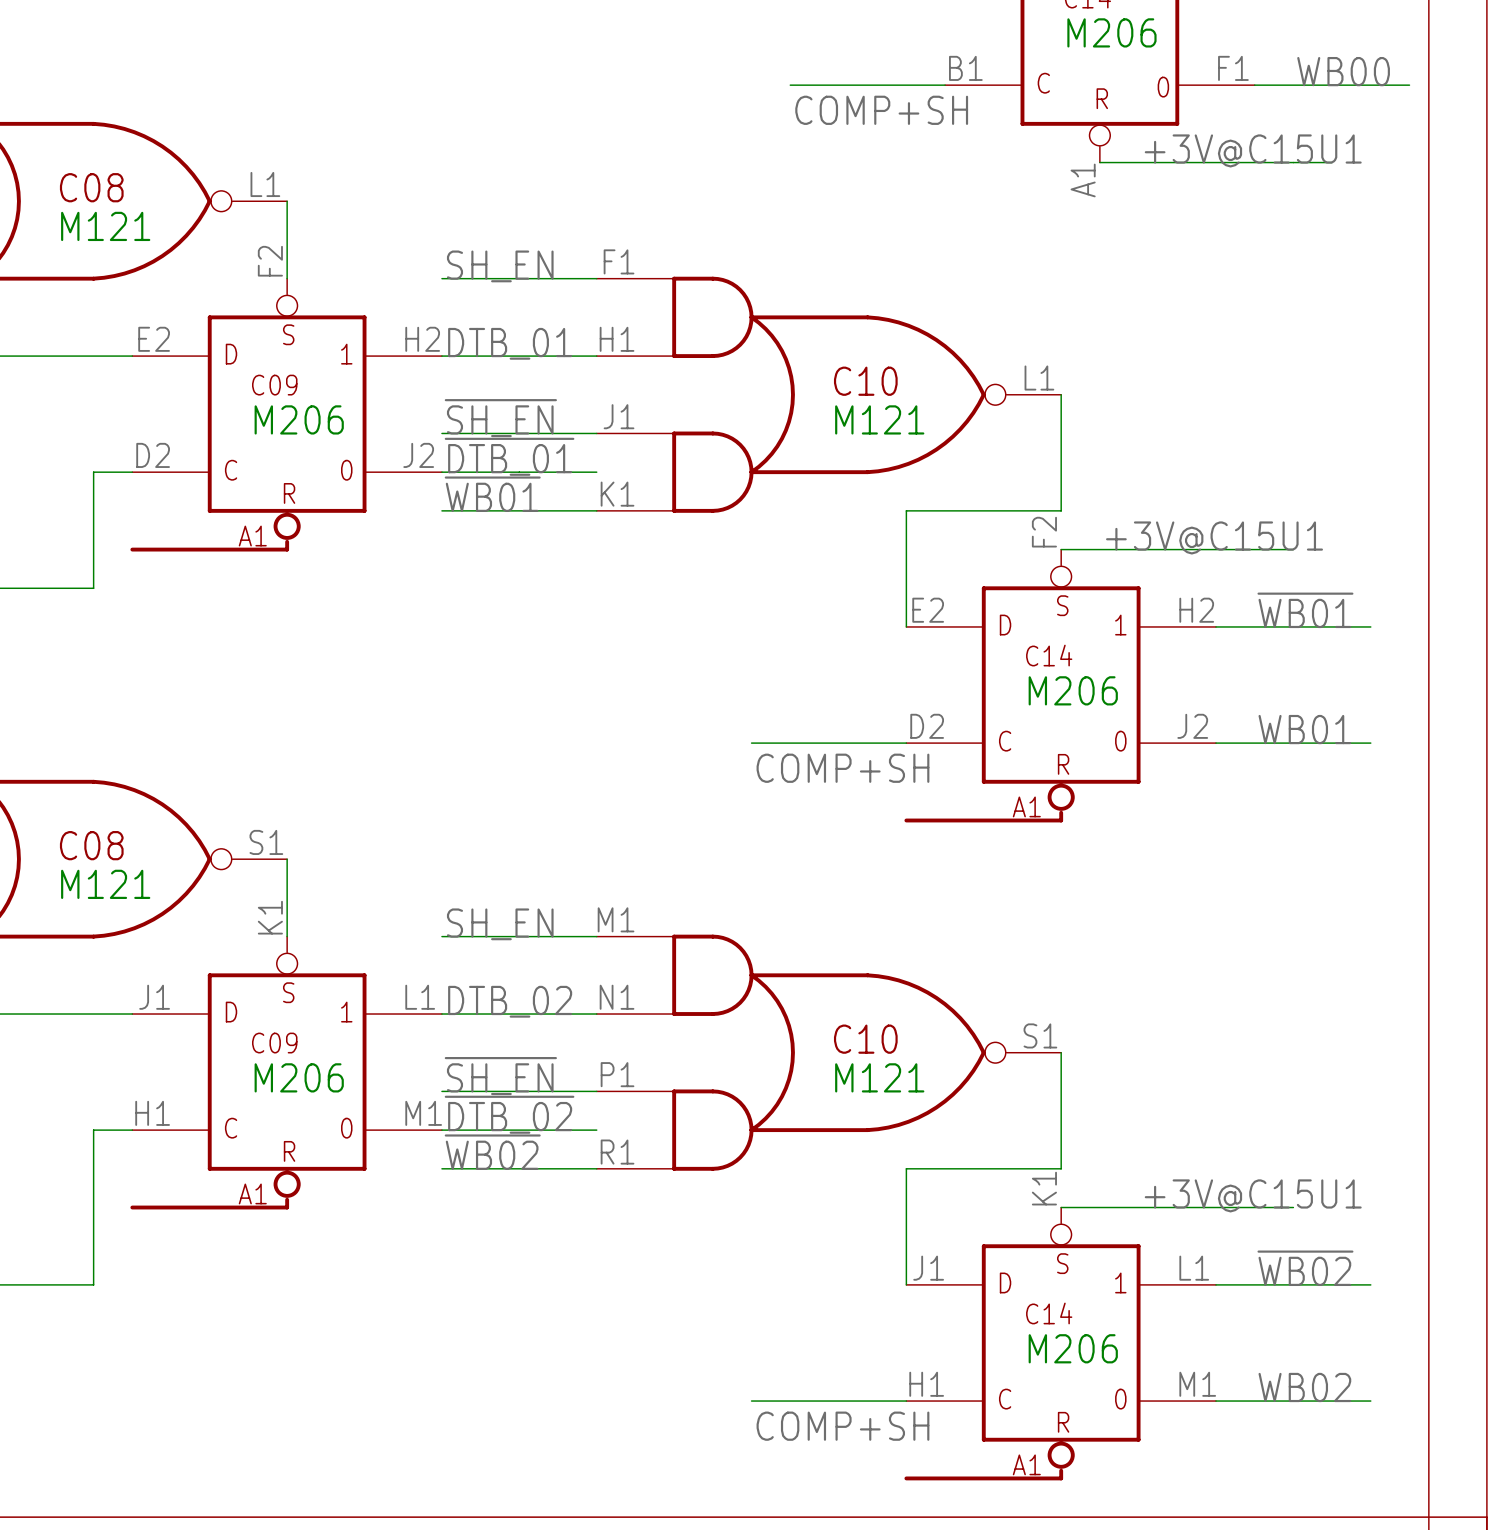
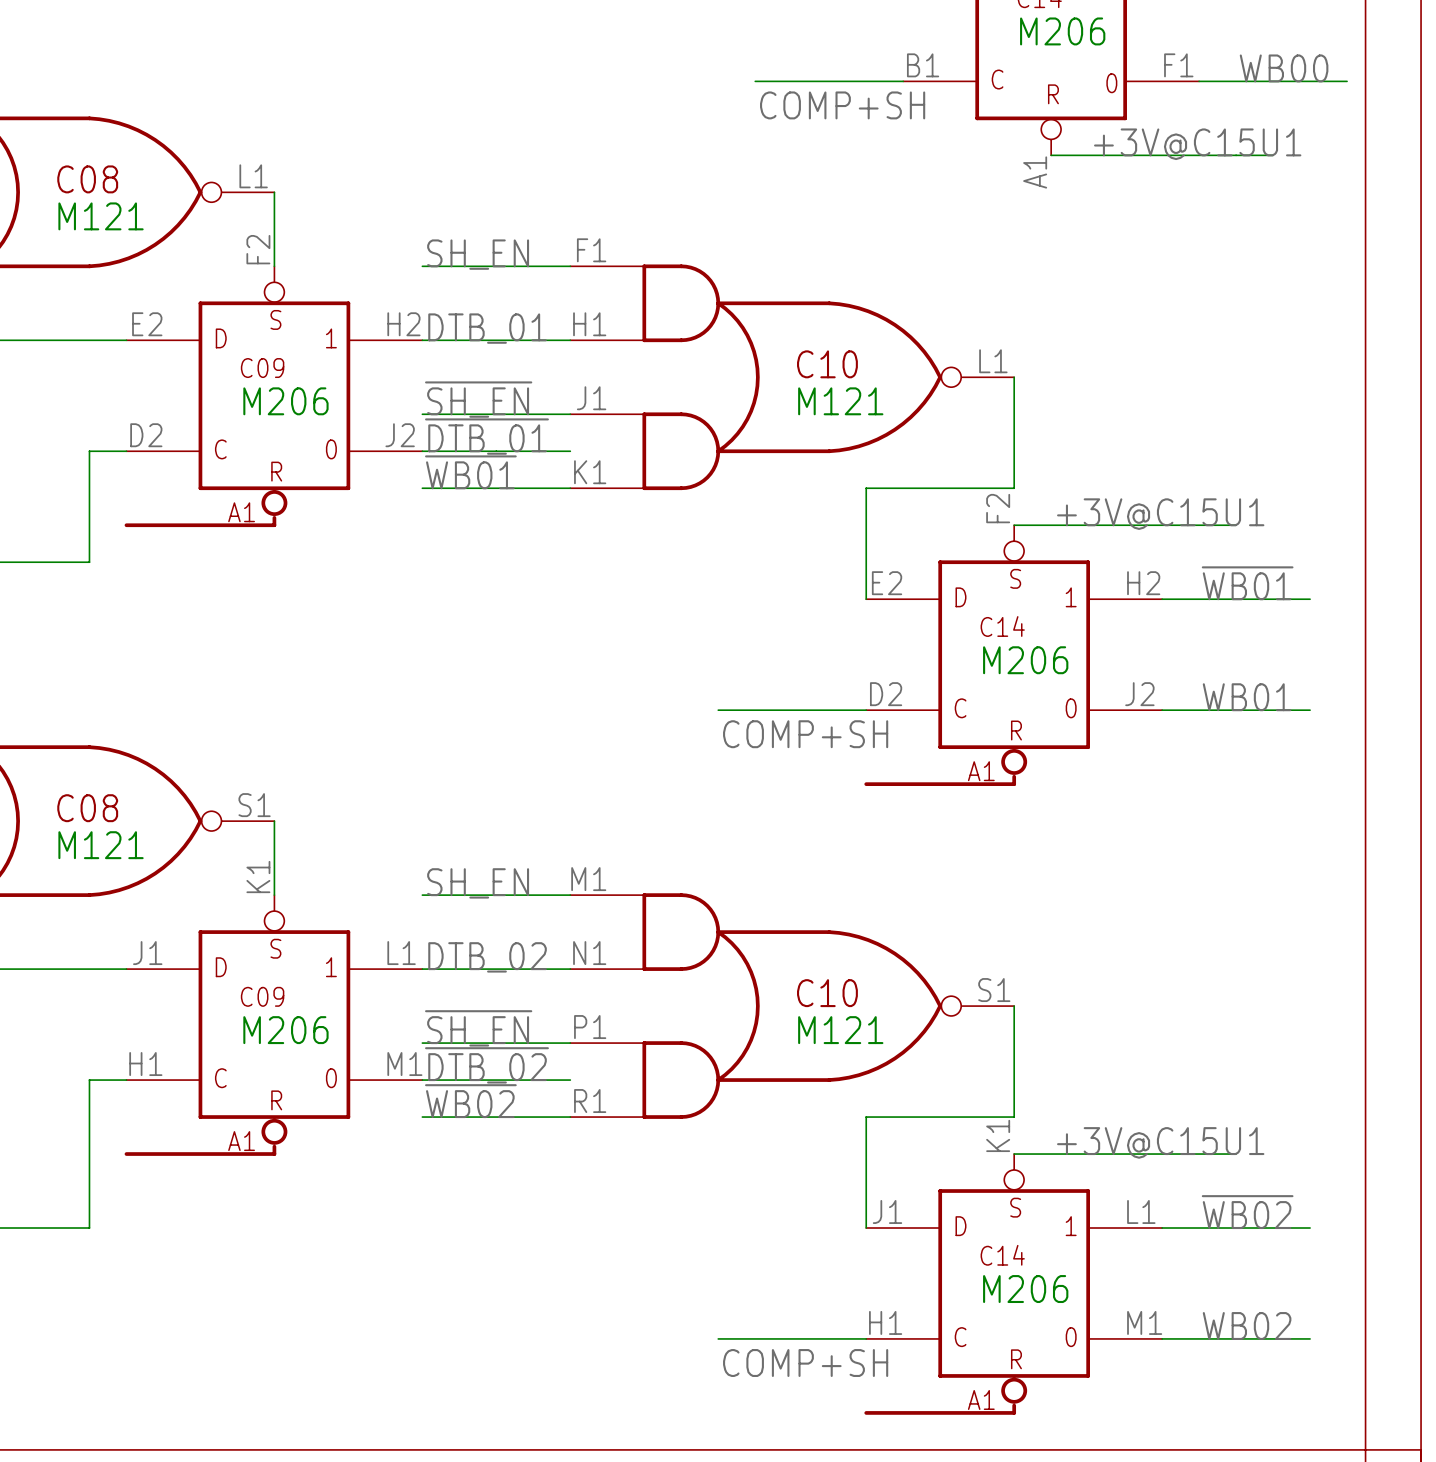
label position: +3V@C15U1 (1253, 1195) -> +3V@C15U1 (1160, 1142)

